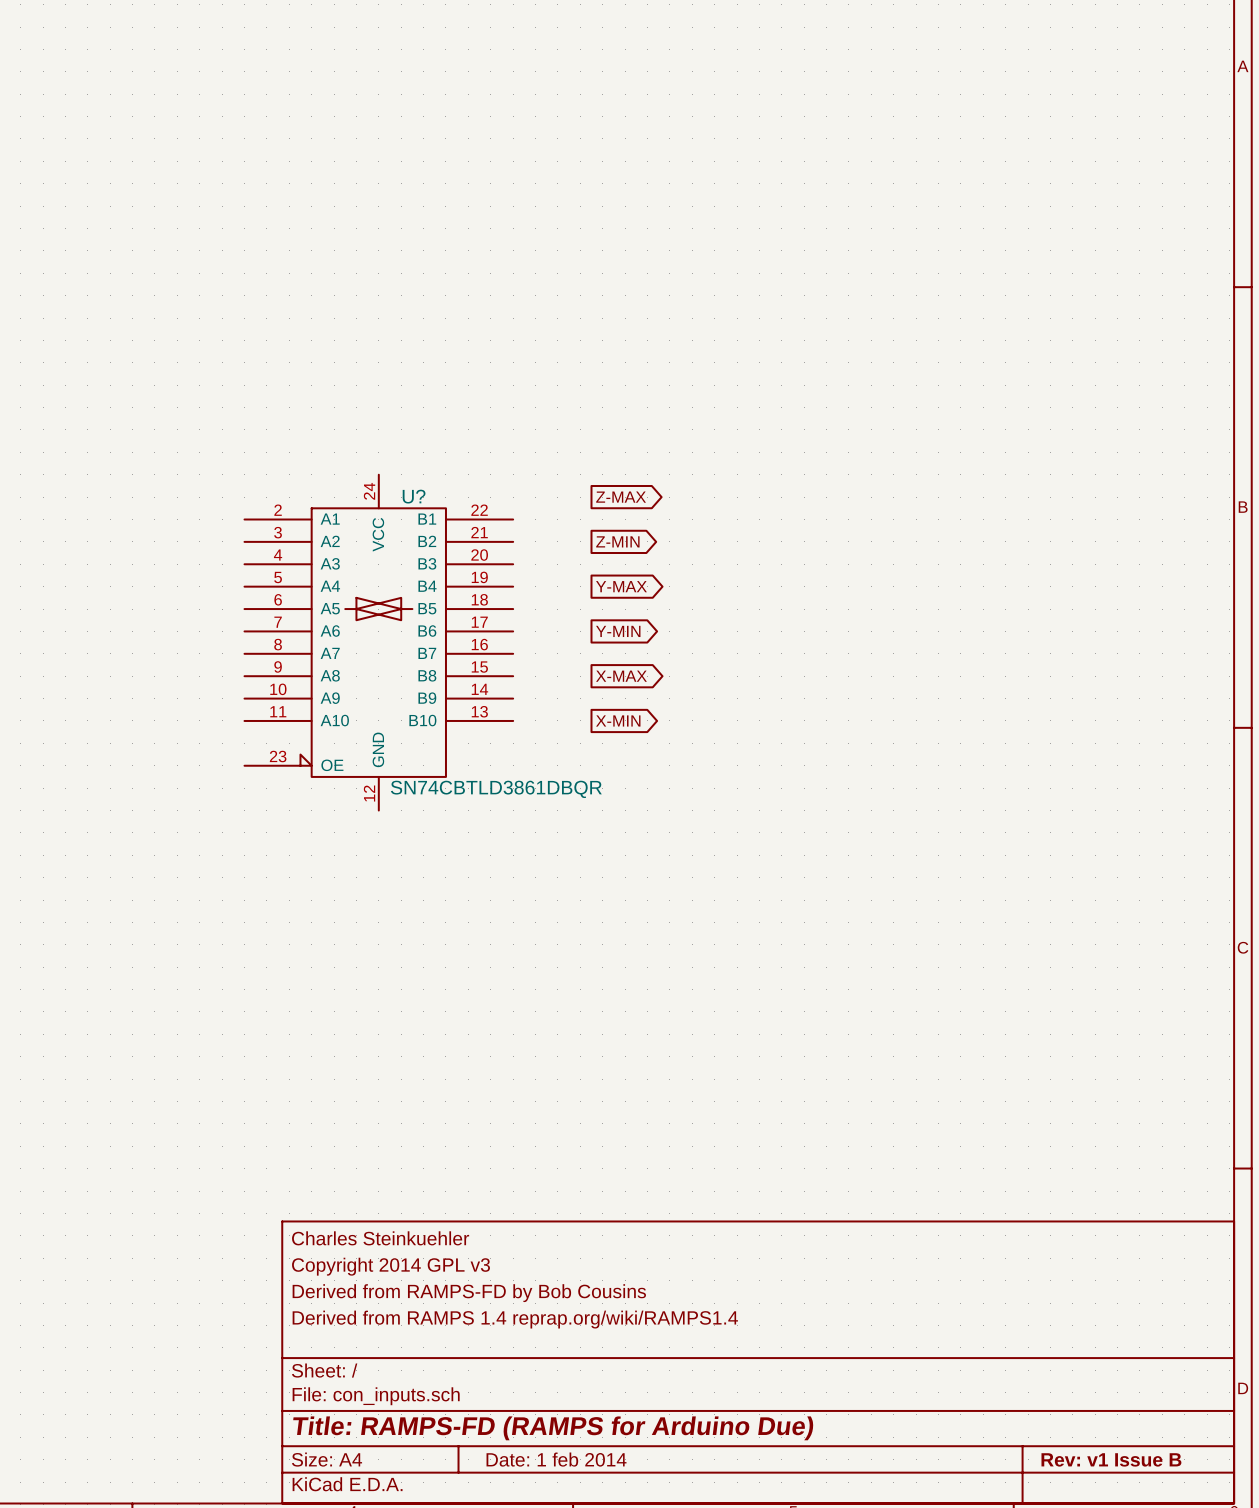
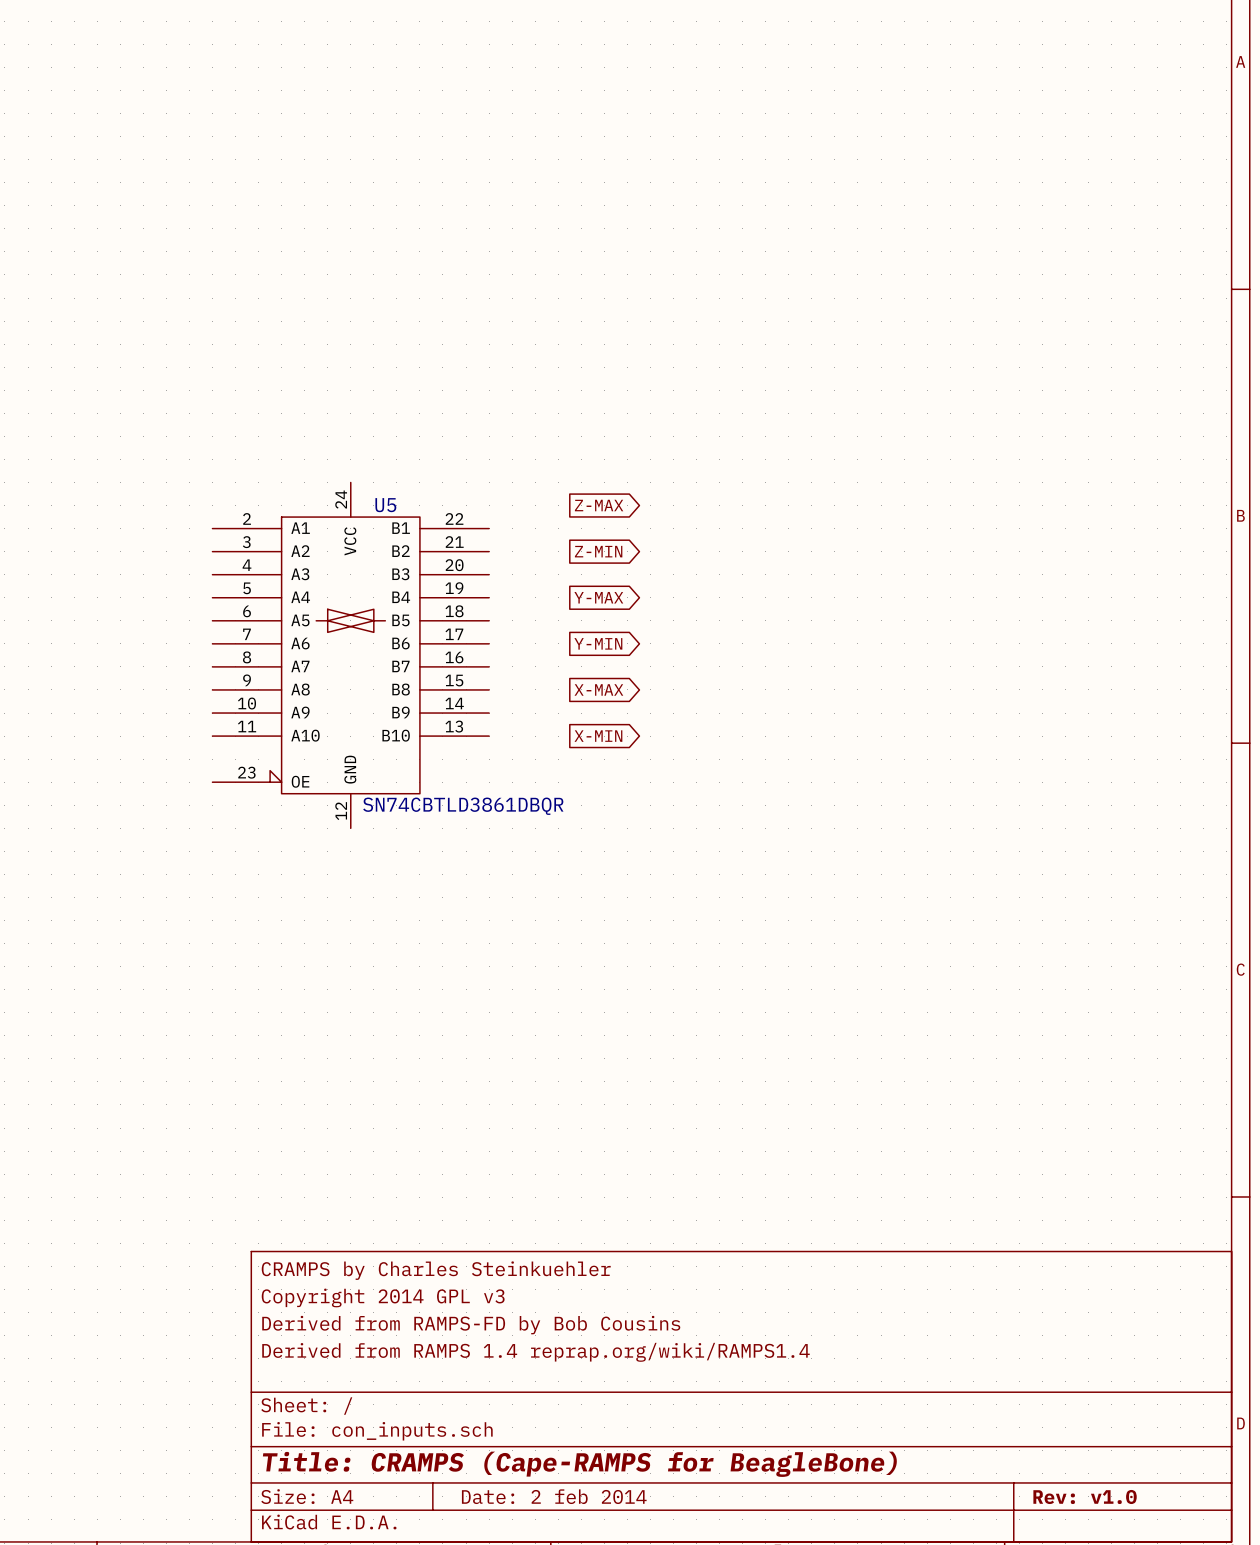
U? name: U? (414, 496) -> U5 (385, 505)
title block: Charles Steinkuehler (380, 1238) -> CRAMPS by Charles Steinkuehler (436, 1270)
title block: Title: RAMPS-FD (RAMPS for Arduino Due) (553, 1428) -> Title: CRAMPS (Cape-RAMPS for BeagleBone) (579, 1464)
title block: Date: 1 feb 2014 (556, 1459) -> Date: 2 feb 2014 (554, 1496)
title block: Rev: v1 Issue B (1111, 1459) -> Rev: v1.0 (1085, 1496)

